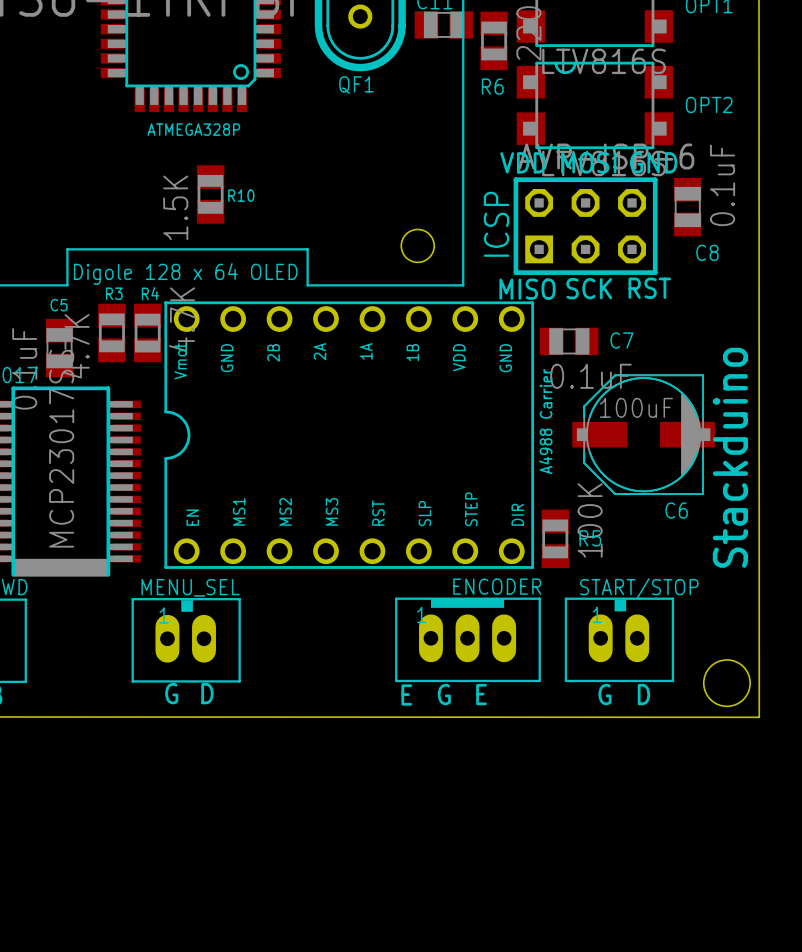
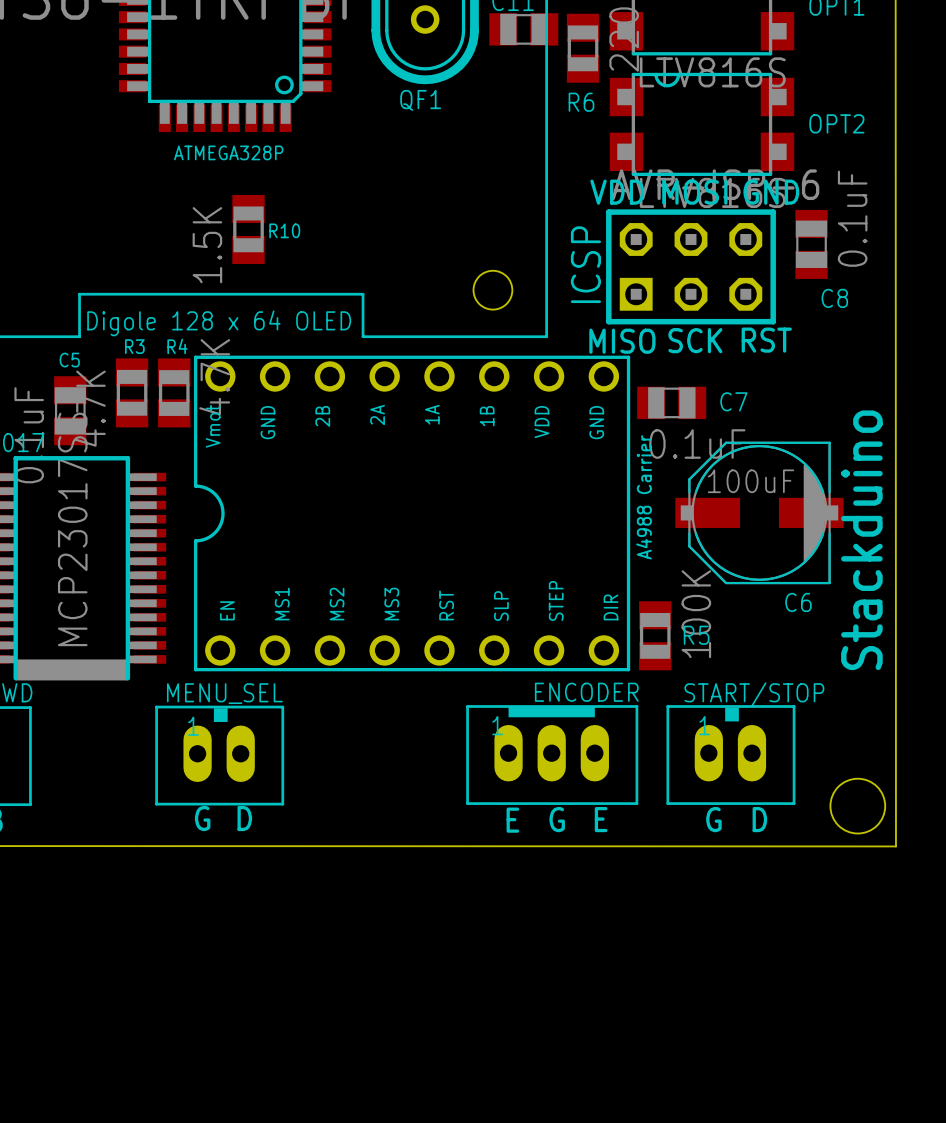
text: G (444, 694) -> E (512, 820)
text: E (481, 694) -> G (557, 819)
text position: E (406, 695) -> E (601, 819)

